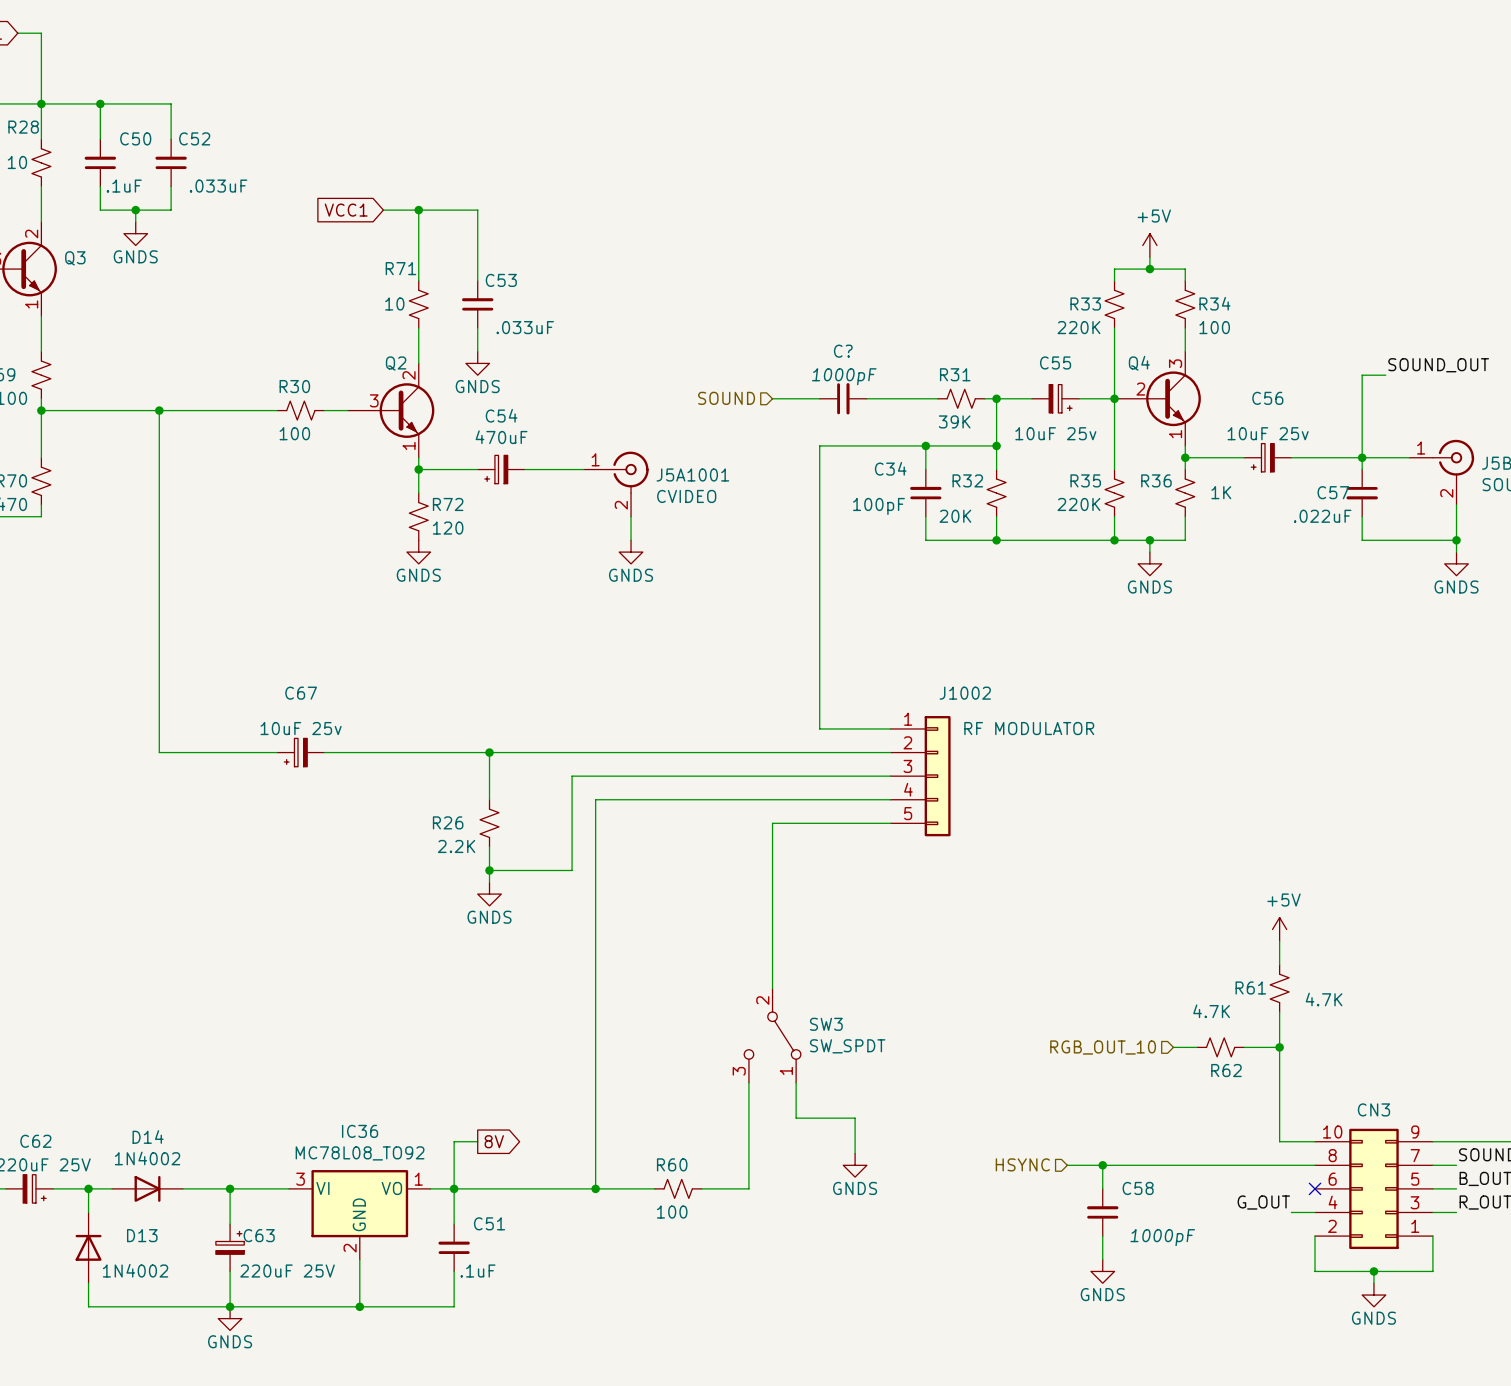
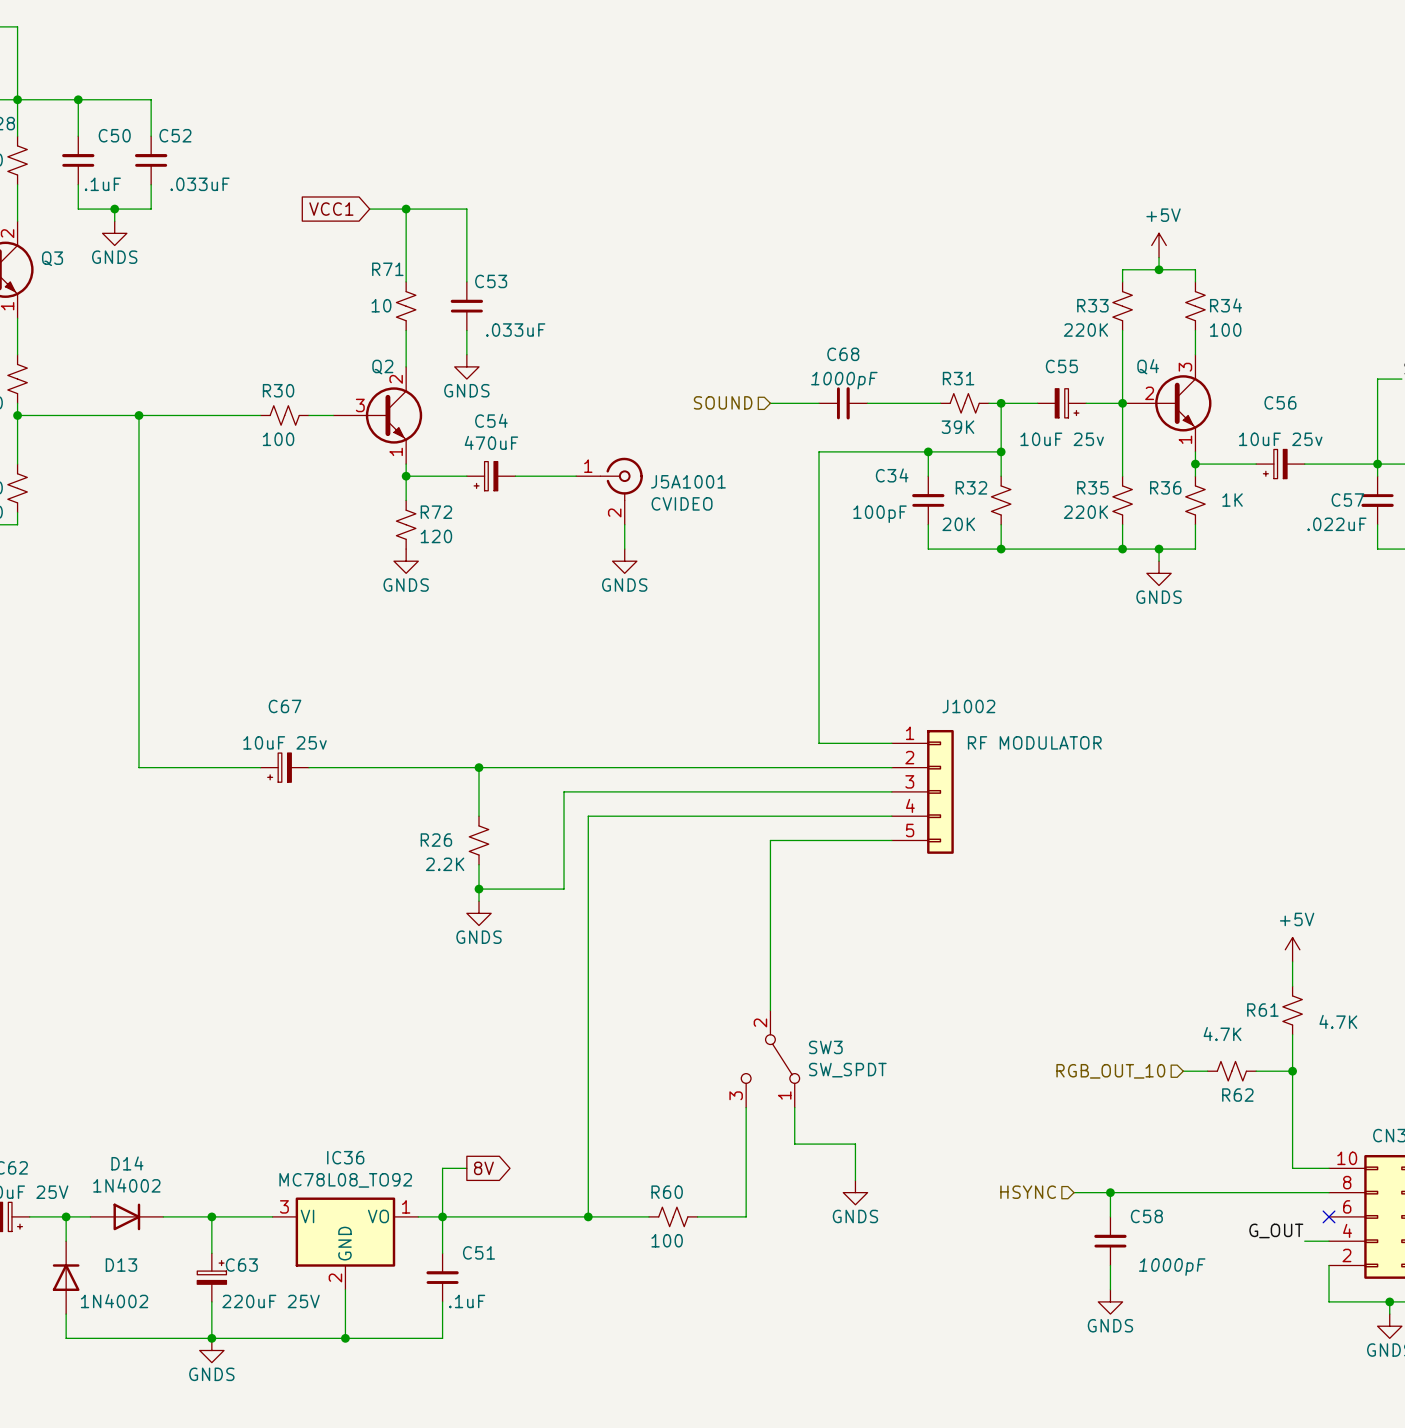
C? name: C? (843, 351) -> C68 (843, 354)

